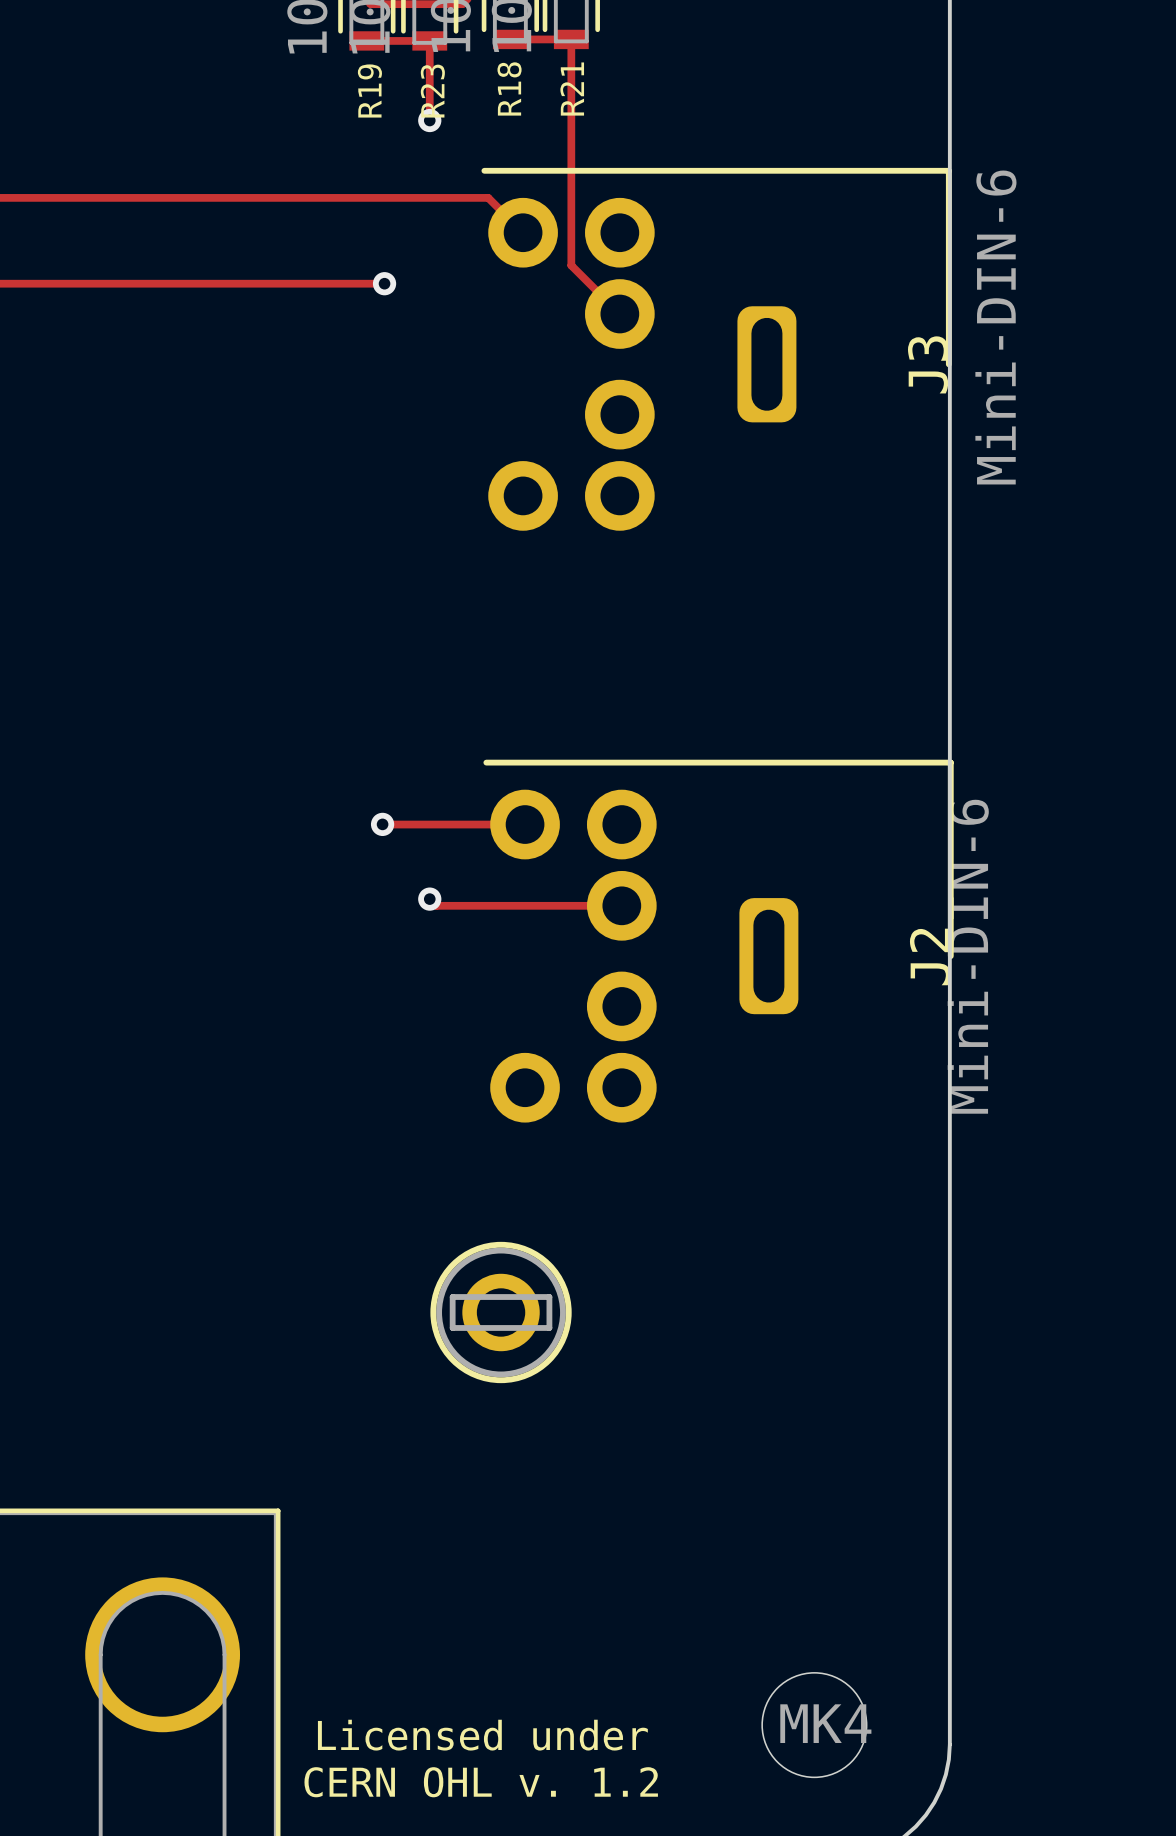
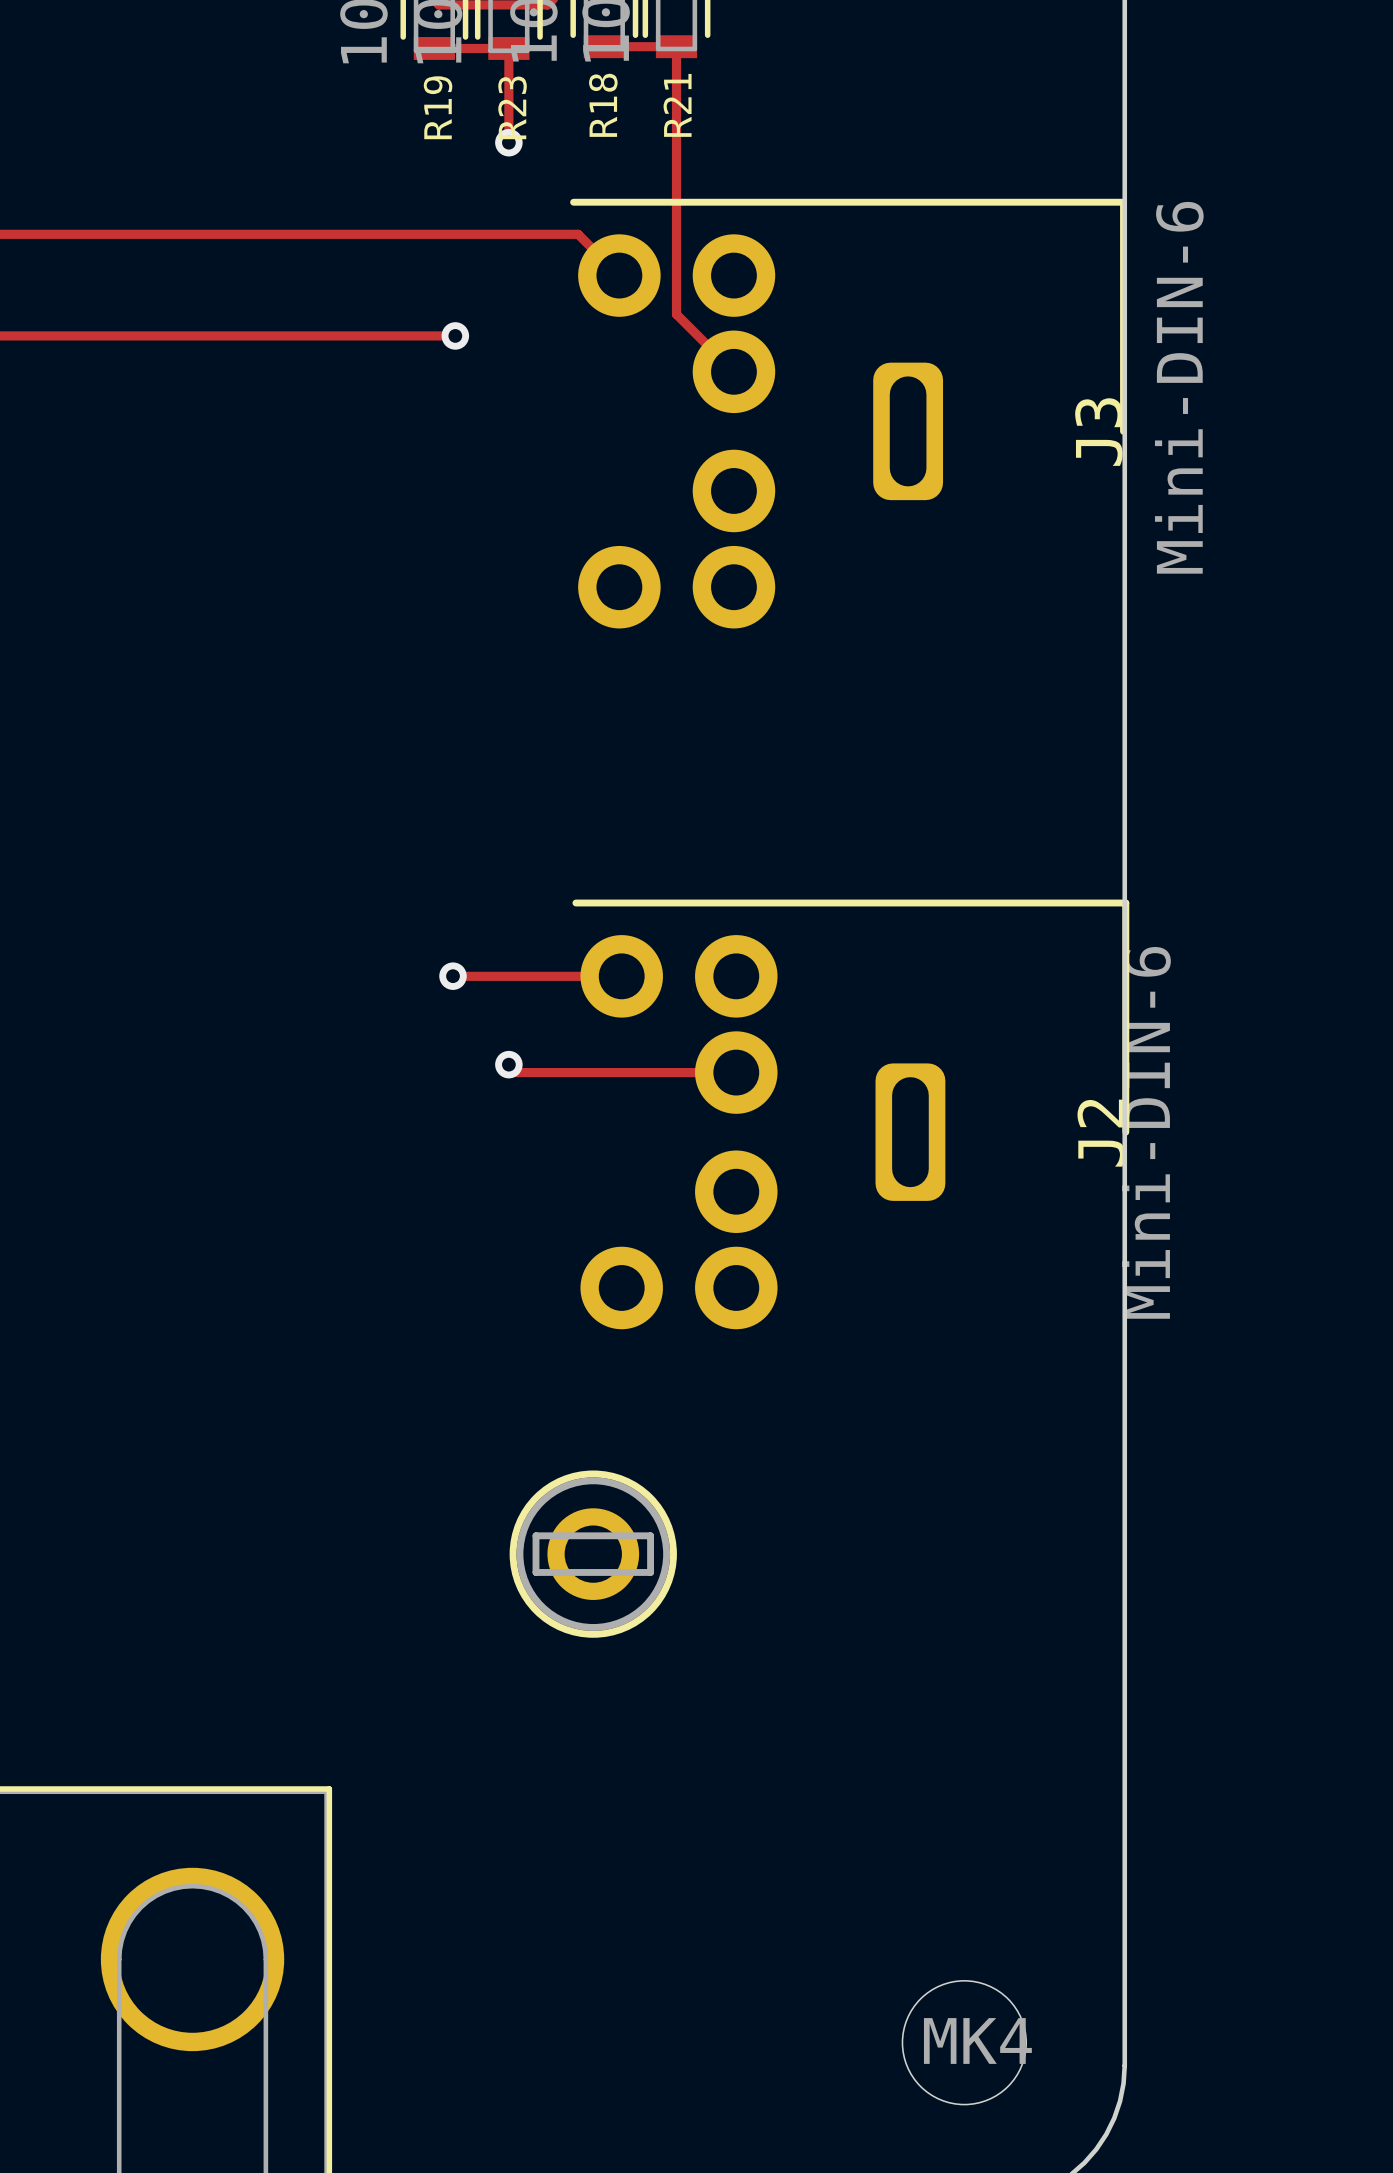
text: Licensed under (482, 1735) -> none
text: CERN OHL v. 1.2 (481, 1782) -> none

